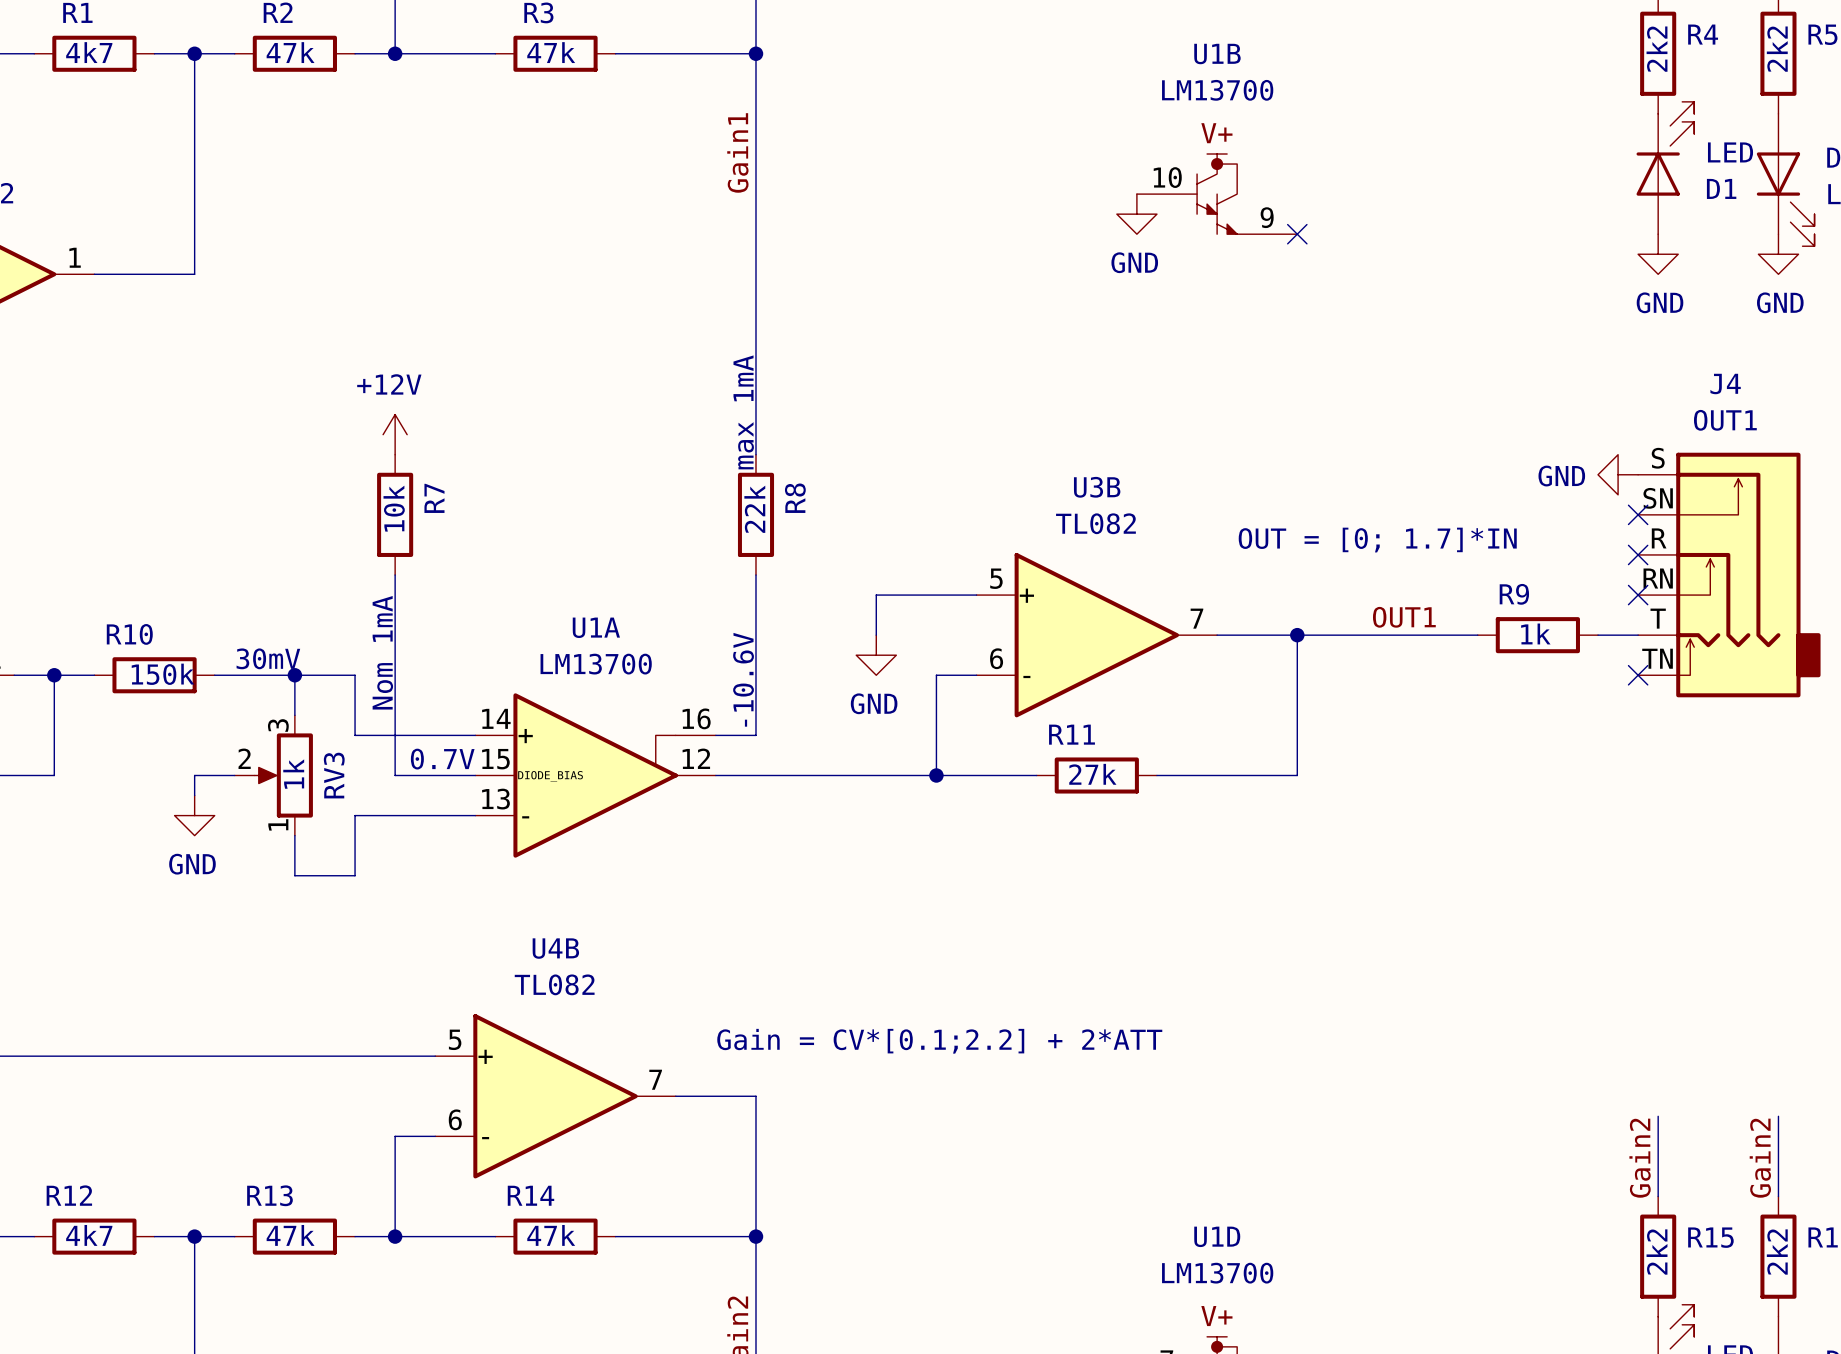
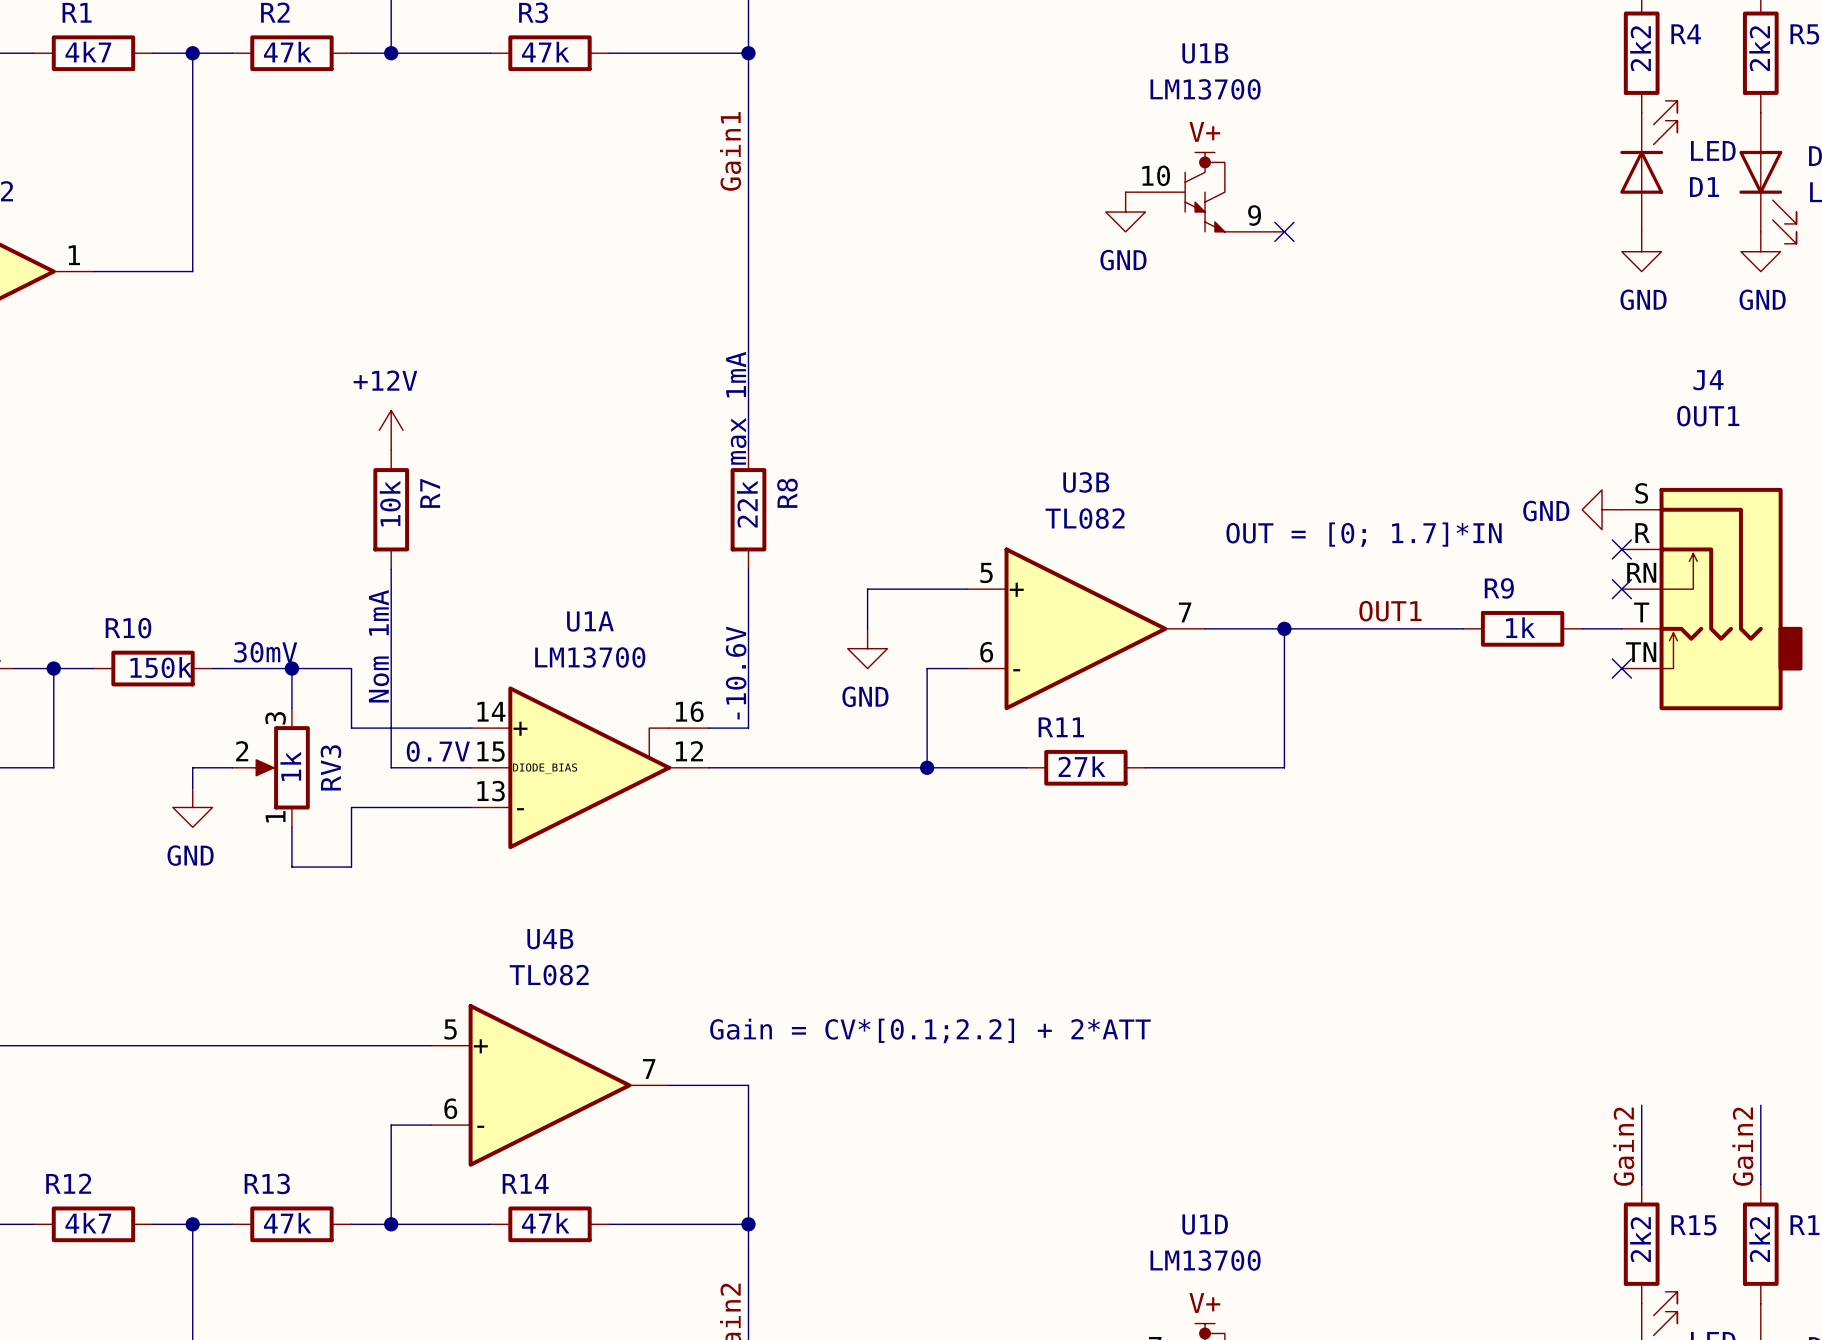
J4 symbol: [1638, 452, 1821, 698] -> [1621, 487, 1803, 711]
power symbol position: GND (1618, 474) -> GND (1602, 509)
no-connect mark: (1638, 514) -> none

